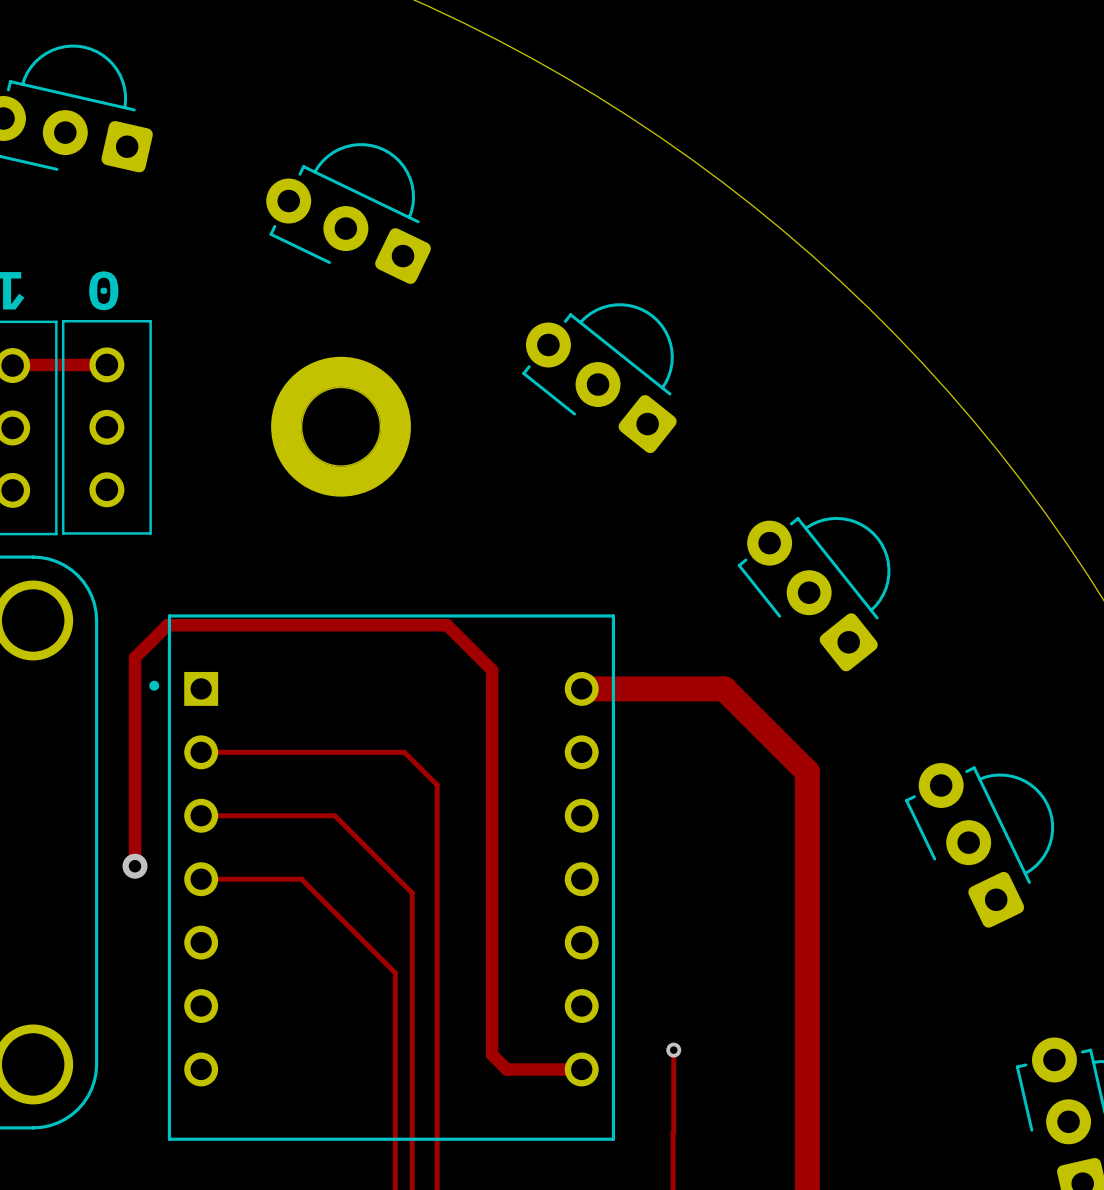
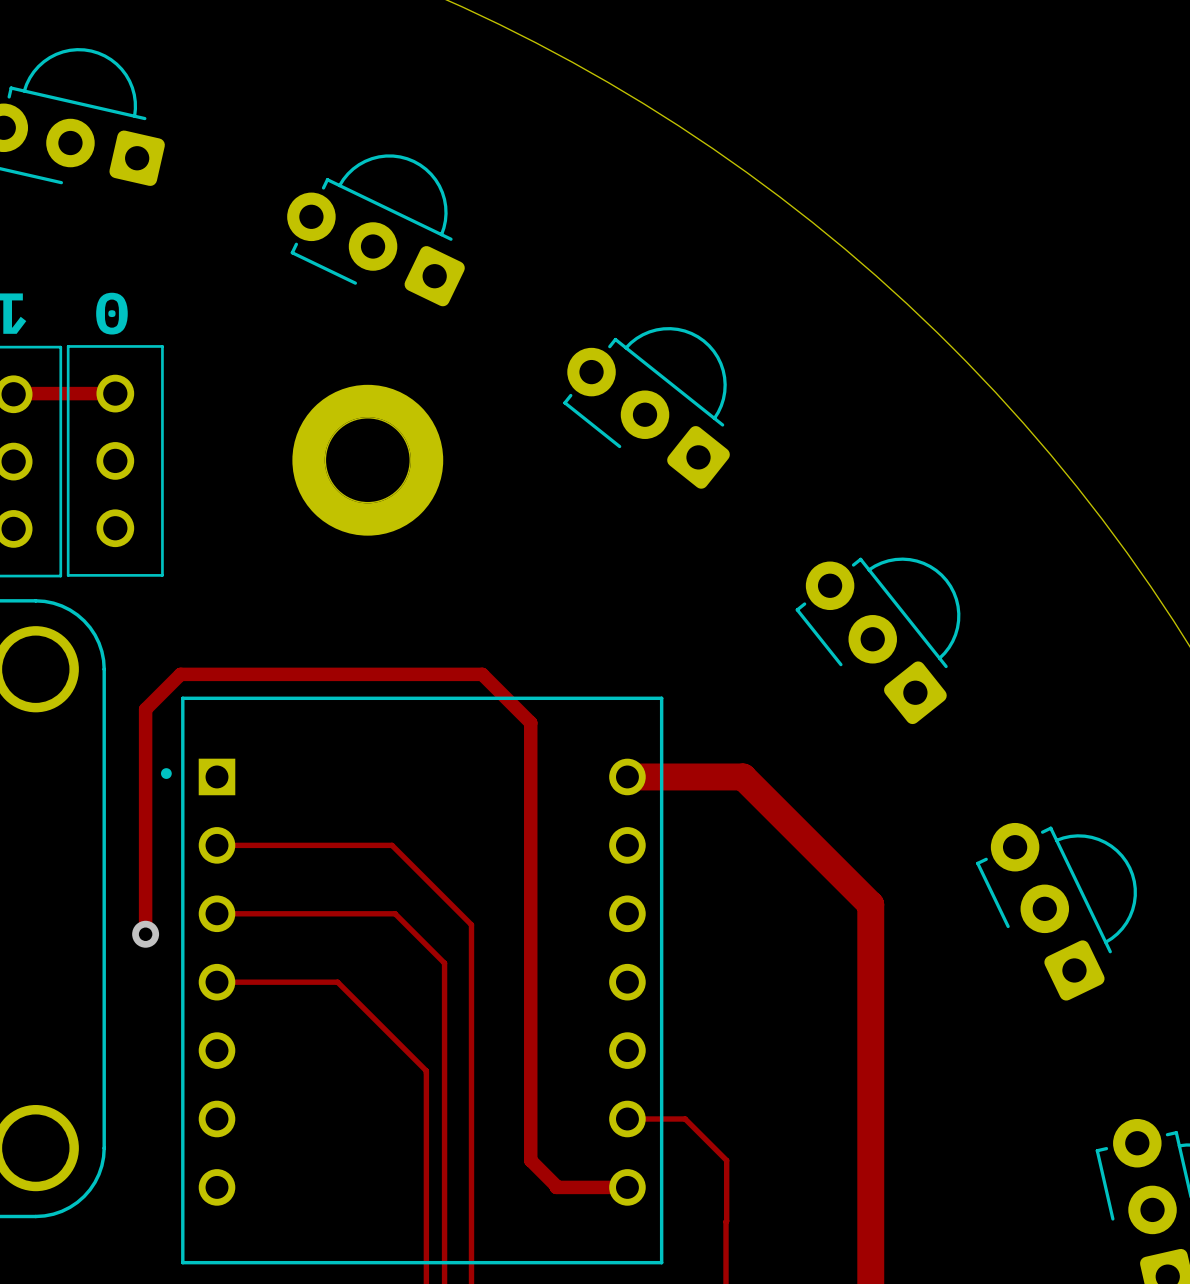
track: (581, 688) (724, 688) (807, 771) (807, 838) -> (627, 776) (743, 776) (870, 904)
track: (201, 752) (404, 752) (437, 785) (437, 857) -> (217, 845) (392, 845) (471, 924)
track: (201, 815) (334, 815) (366, 847) -> (217, 913) (395, 913)
part position: (382, 877) -> (412, 980)
track: (201, 879) (301, 879) (395, 972) (395, 992) -> (217, 982) (337, 982) (426, 1070)
track: (673, 1050) (673, 1075) -> (627, 1119) (685, 1119) (726, 1160)
via: (673, 1050) -> none
track: (492, 1054) (506, 1069) (581, 1069) -> (530, 1137) (530, 1160) (556, 1187) (627, 1187)

